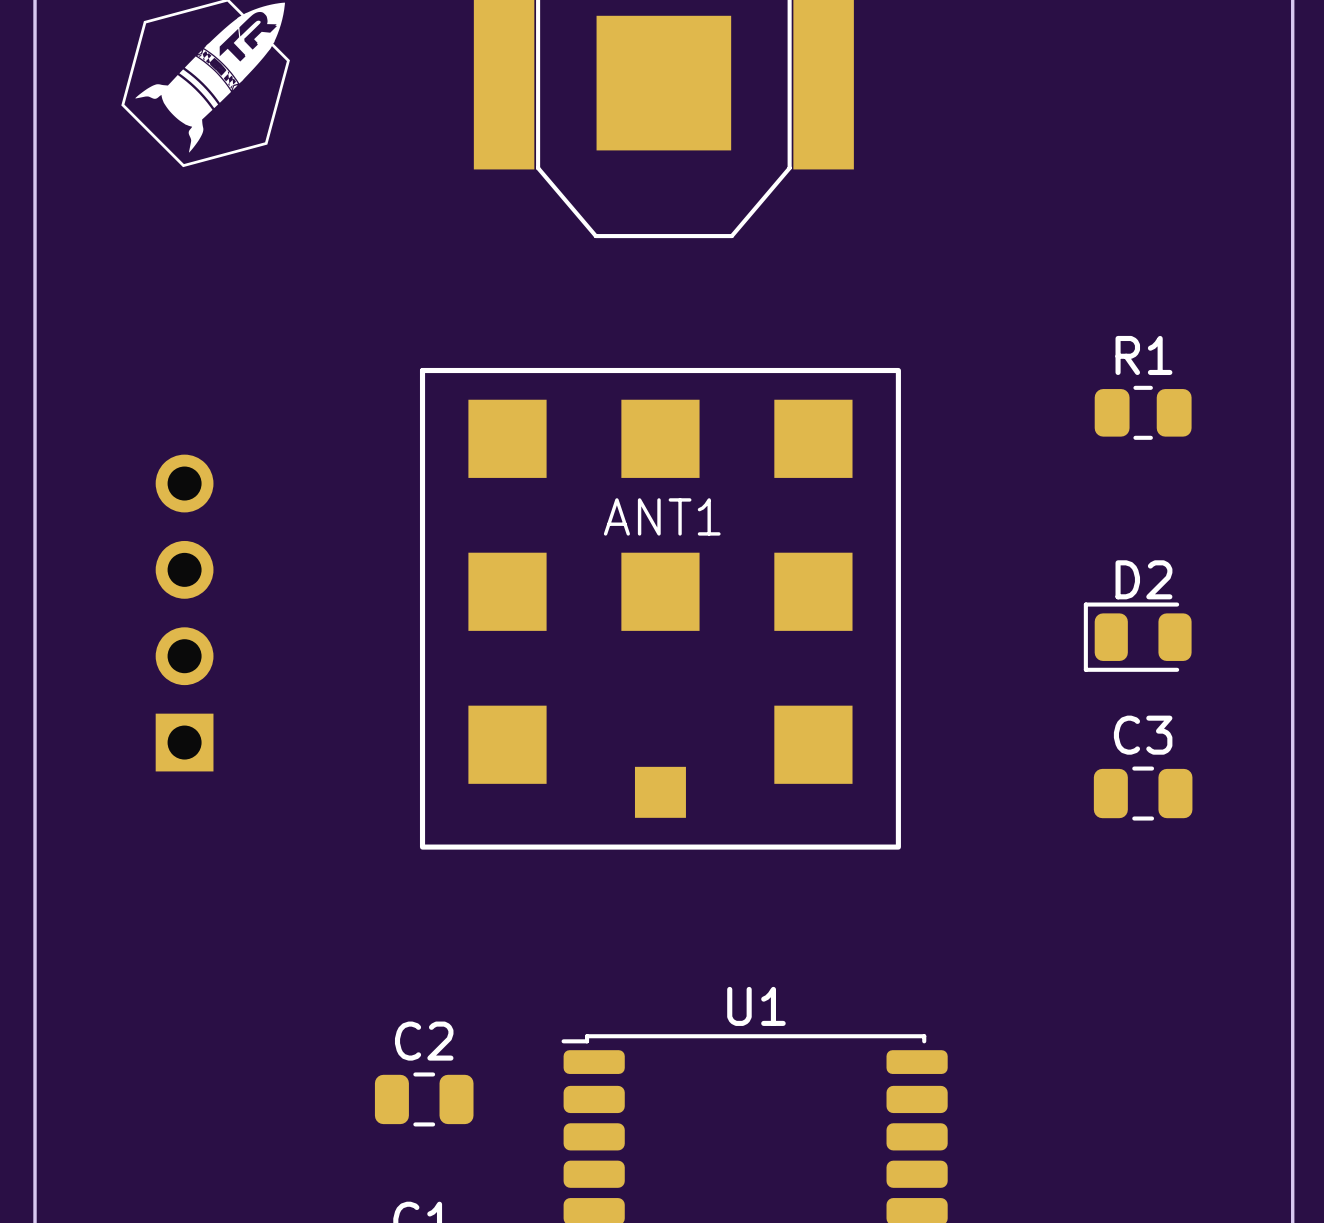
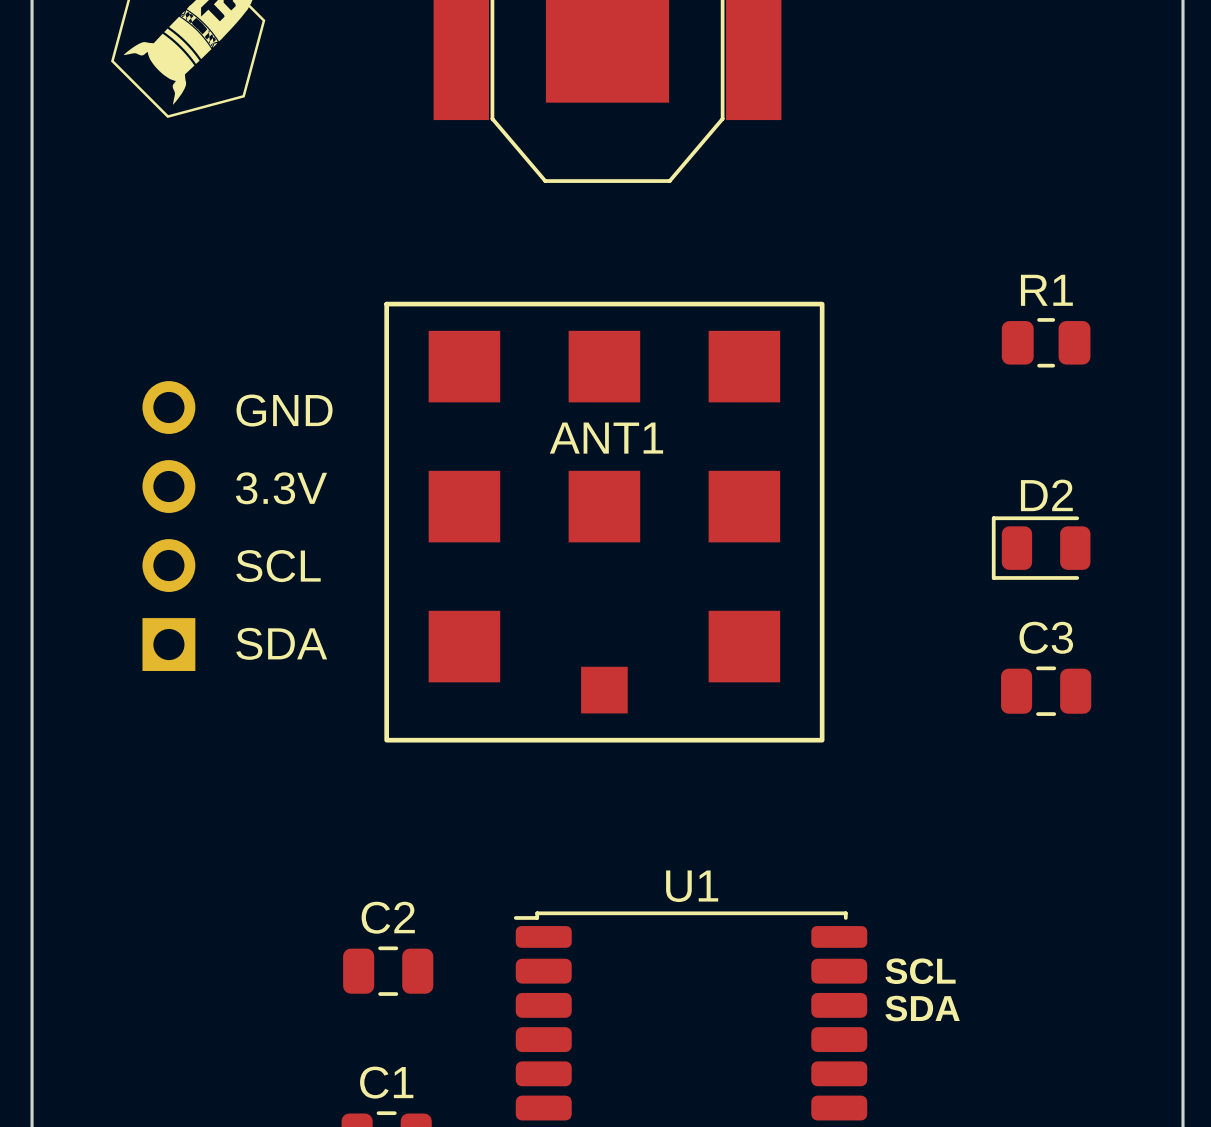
text: none -> GND (284, 410)
text: none -> 3.3V (281, 488)
text: none -> SCL (278, 566)
text: none -> SDA (281, 643)
text: none -> SCL (920, 971)
text: none -> SDA (922, 1008)

